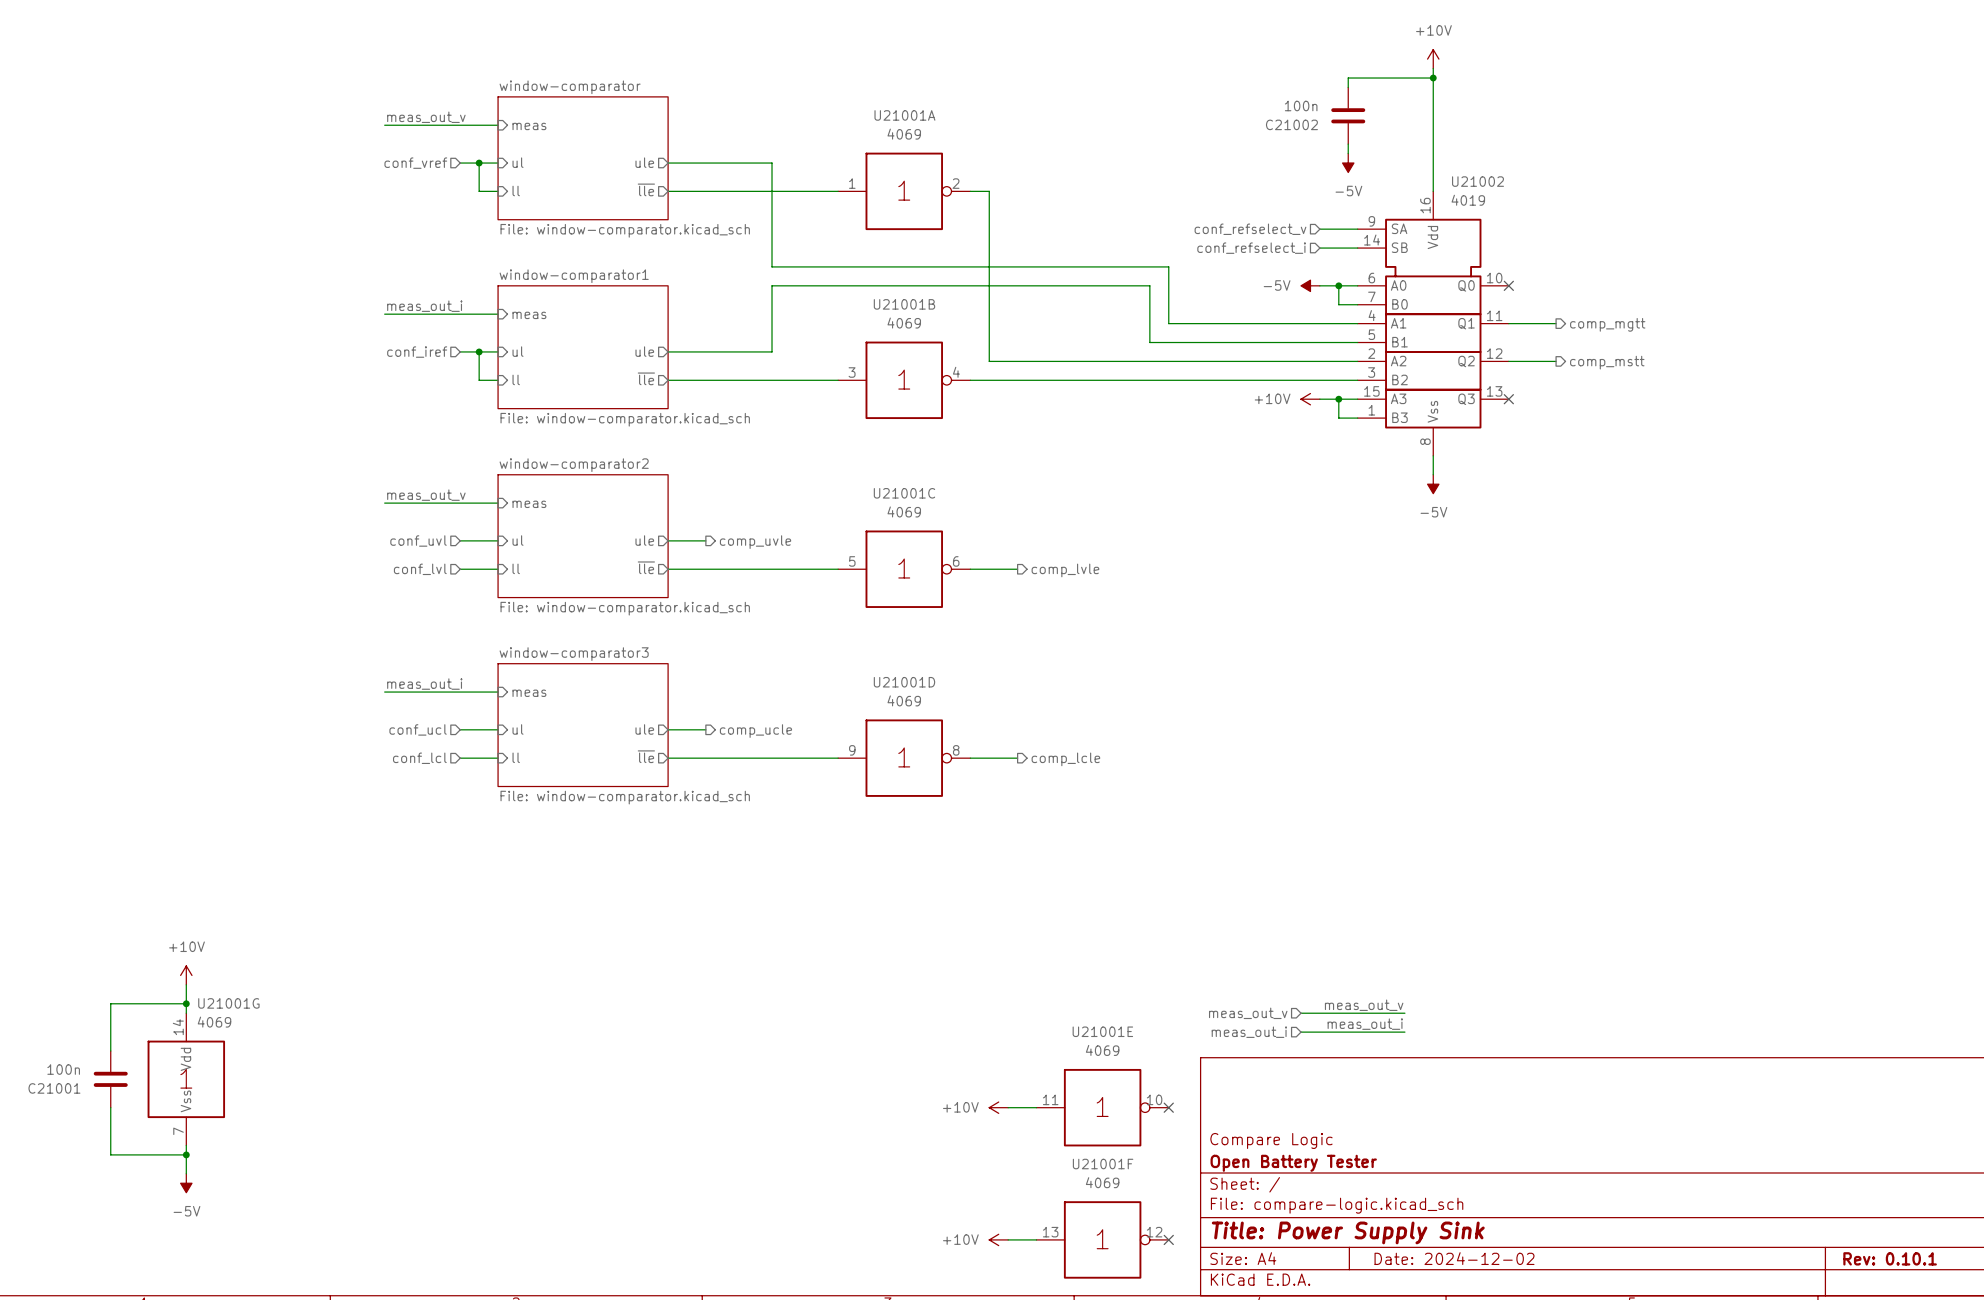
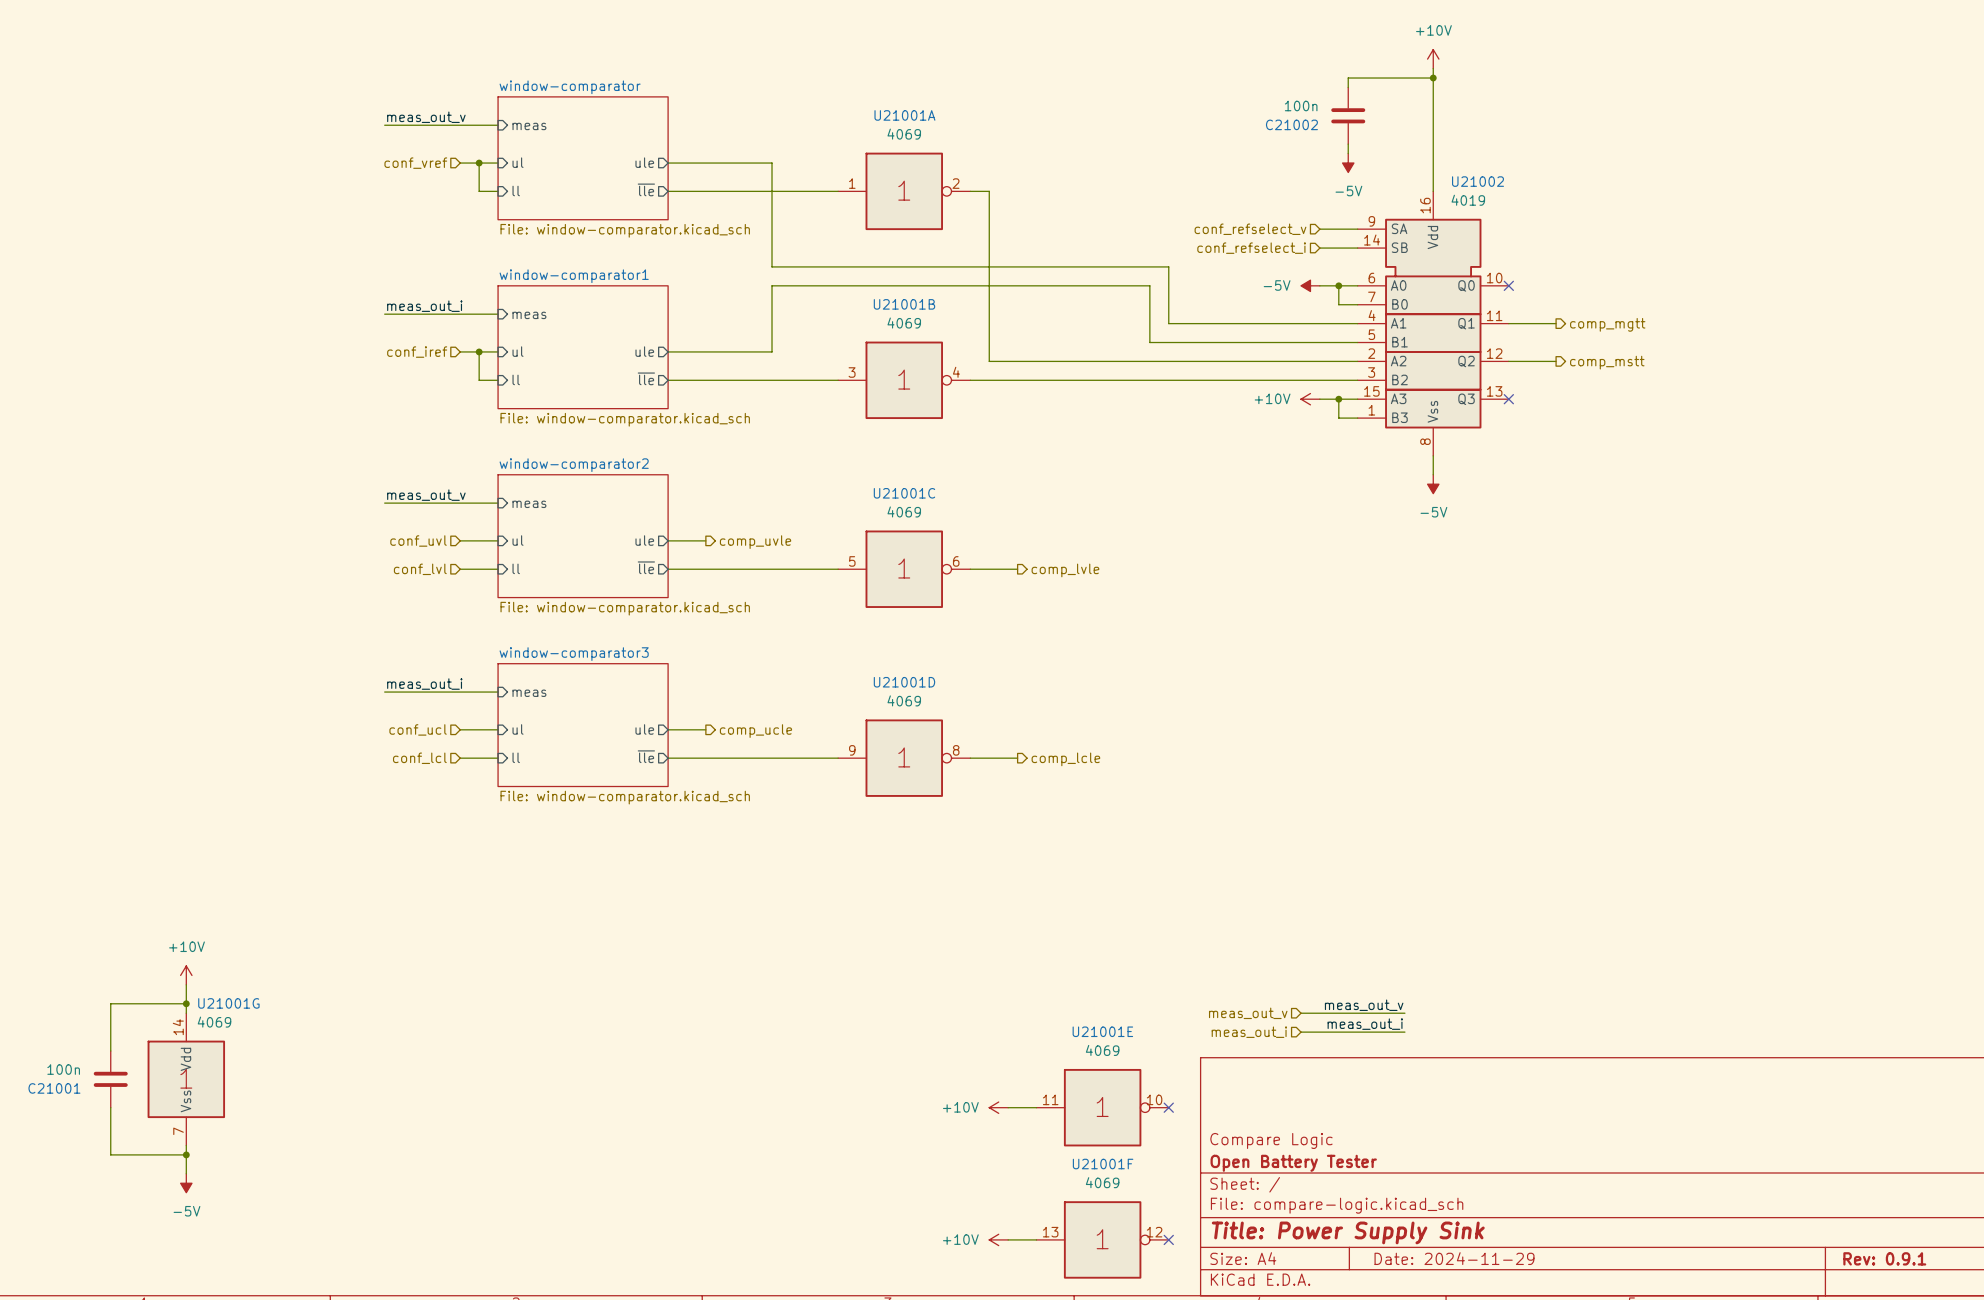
title block: Date: 2024-12-02 (1454, 1258) -> Date: 2024-11-29 (1454, 1258)
title block: Rev: 0.10.1 (1890, 1258) -> Rev: 0.9.1 (1884, 1258)

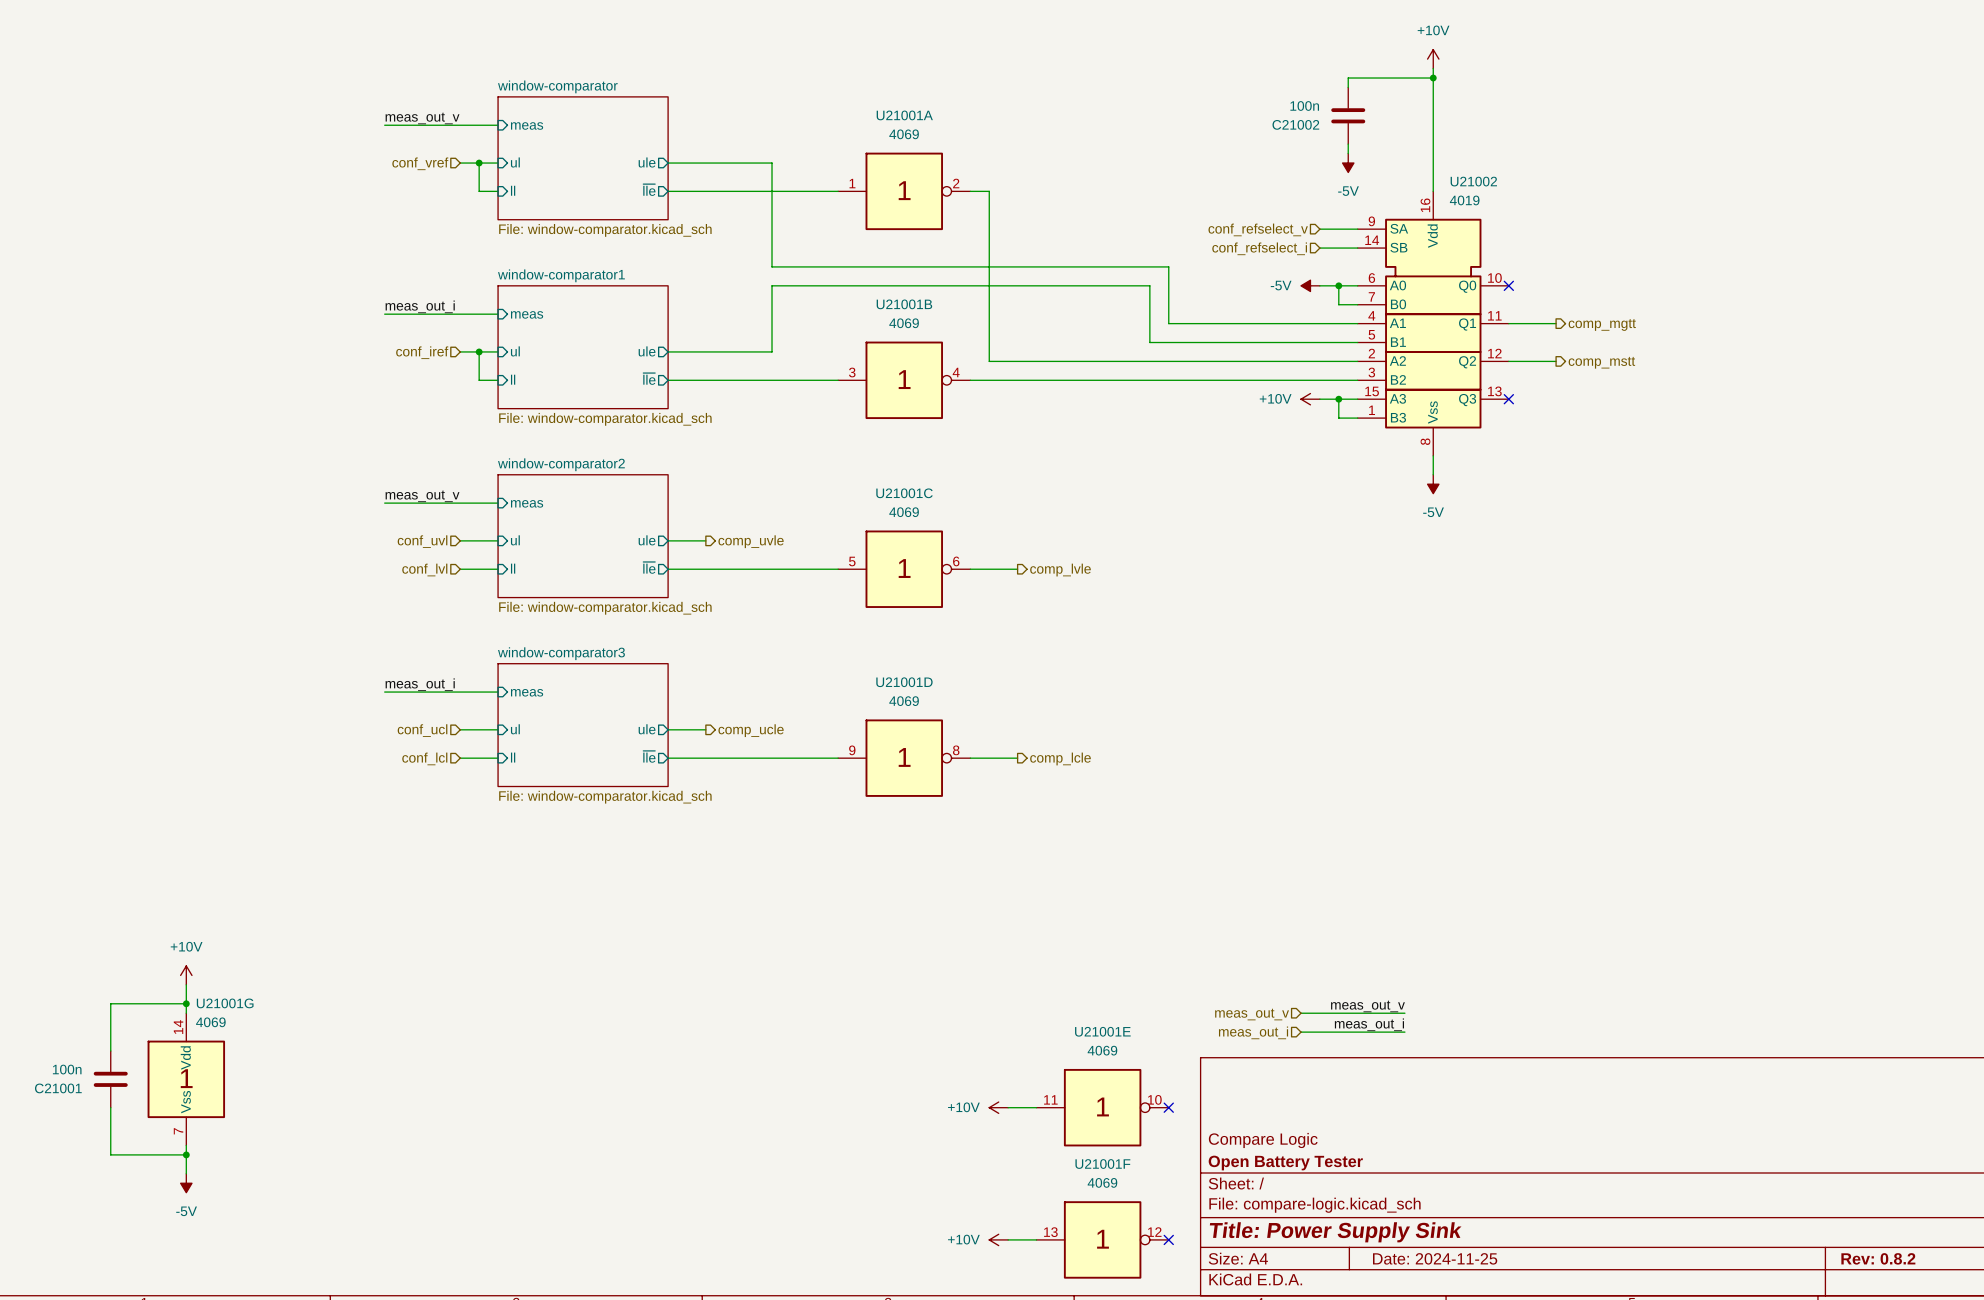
title block: Date: 2024-11-29 (1454, 1258) -> Date: 2024-11-25 (1435, 1258)
title block: Rev: 0.9.1 (1884, 1258) -> Rev: 0.8.2 (1878, 1258)

